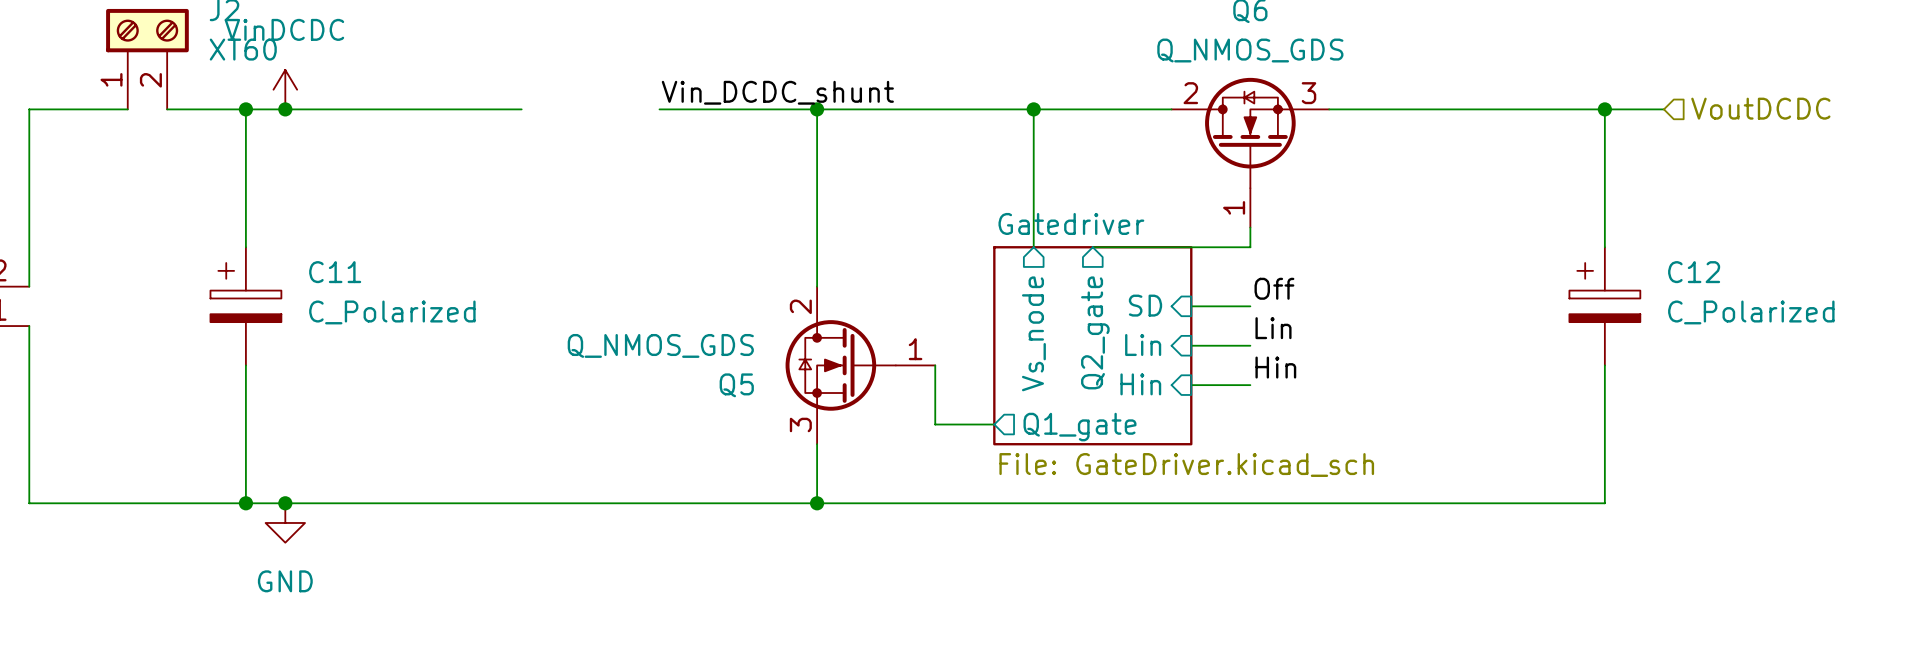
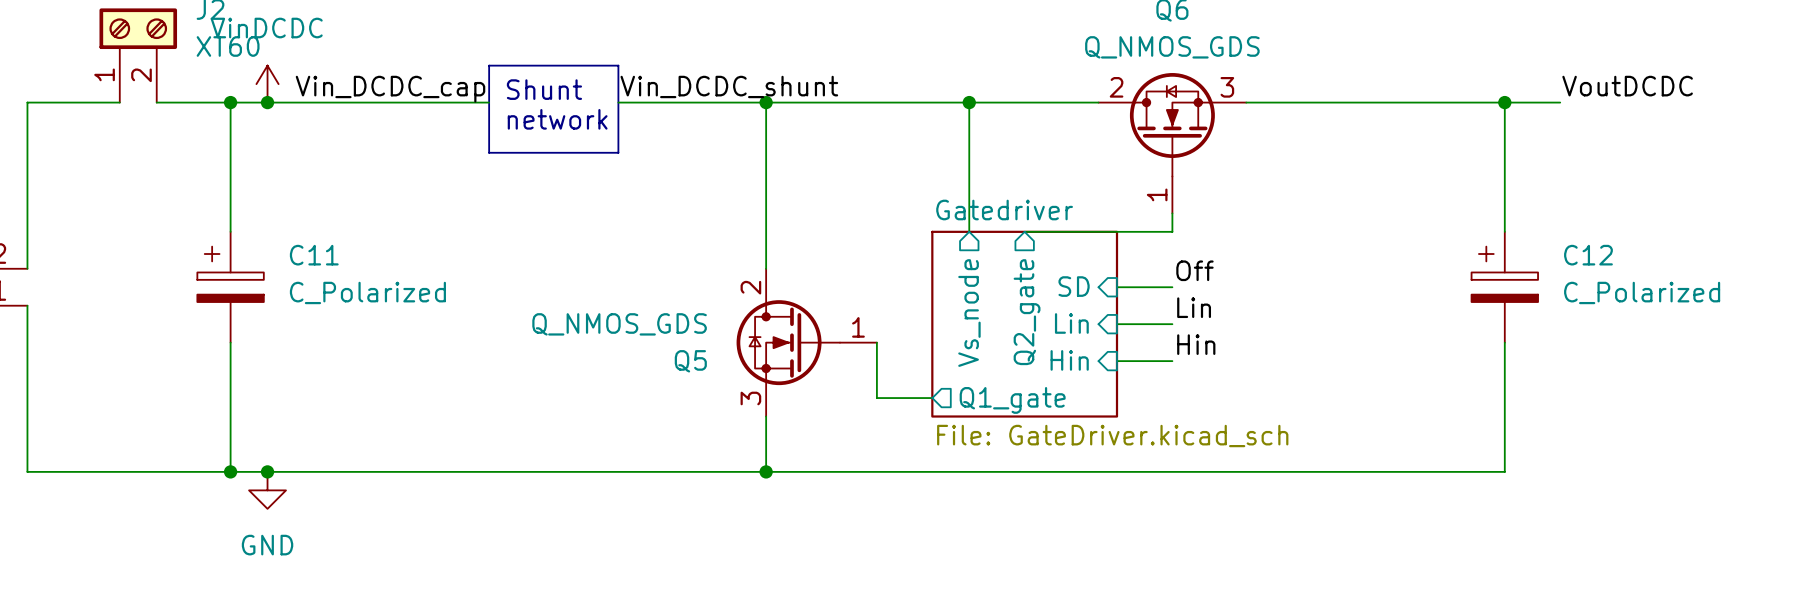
line: none -> (489, 65) (618, 65) (618, 152) (489, 152) (489, 65)
label: none -> VoutDCDC (1627, 86)
label: none -> Vin_DCDC_cap (390, 89)
text: none -> Shunt (544, 89)
hierarchical label: VoutDCDC (1760, 108) -> none
text: none -> network (557, 119)

